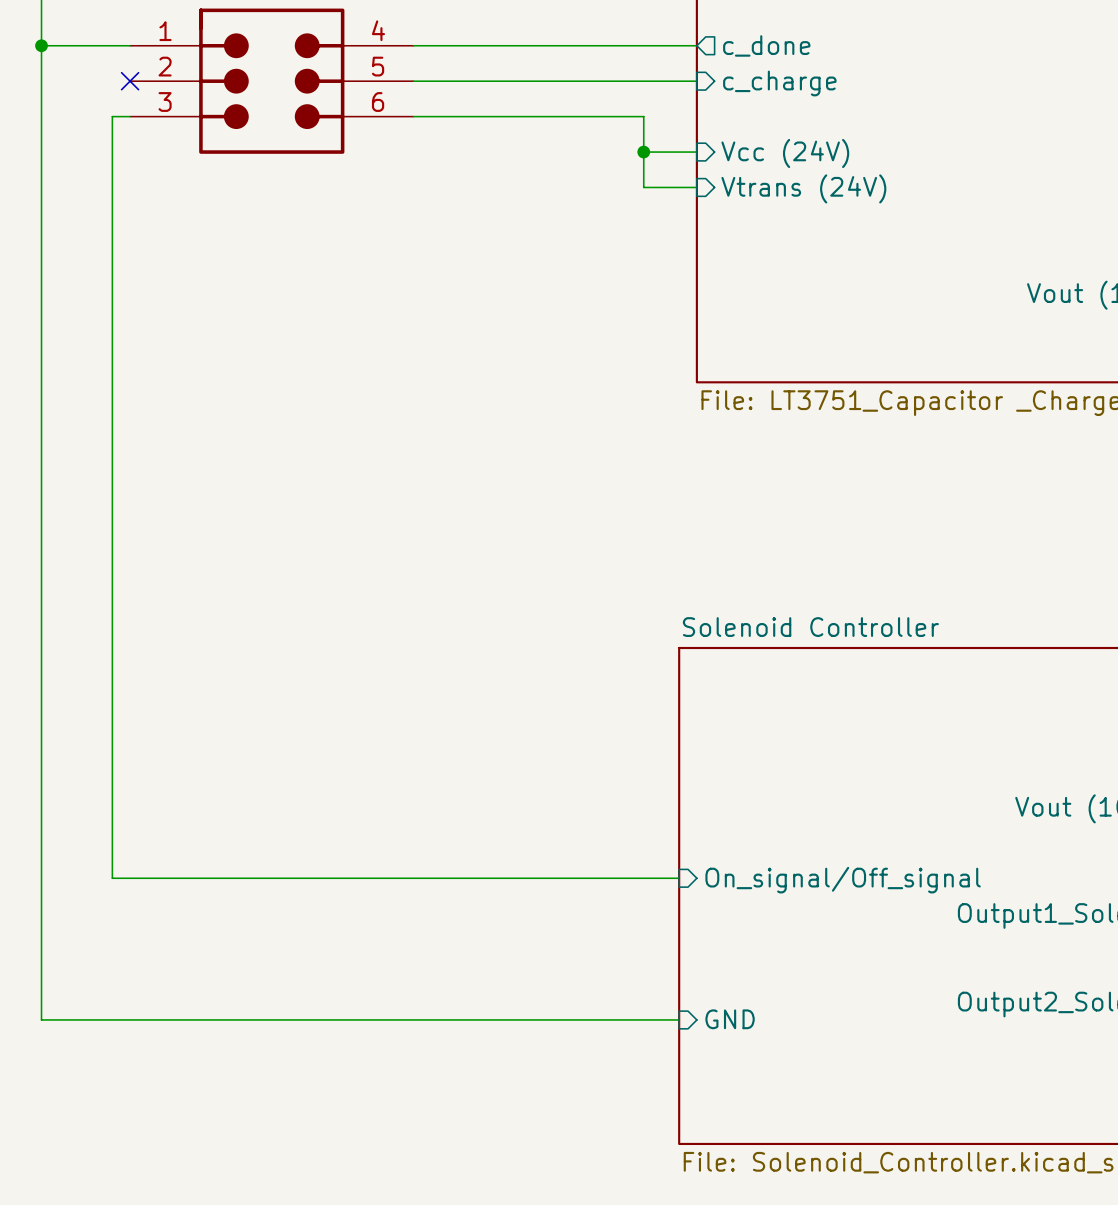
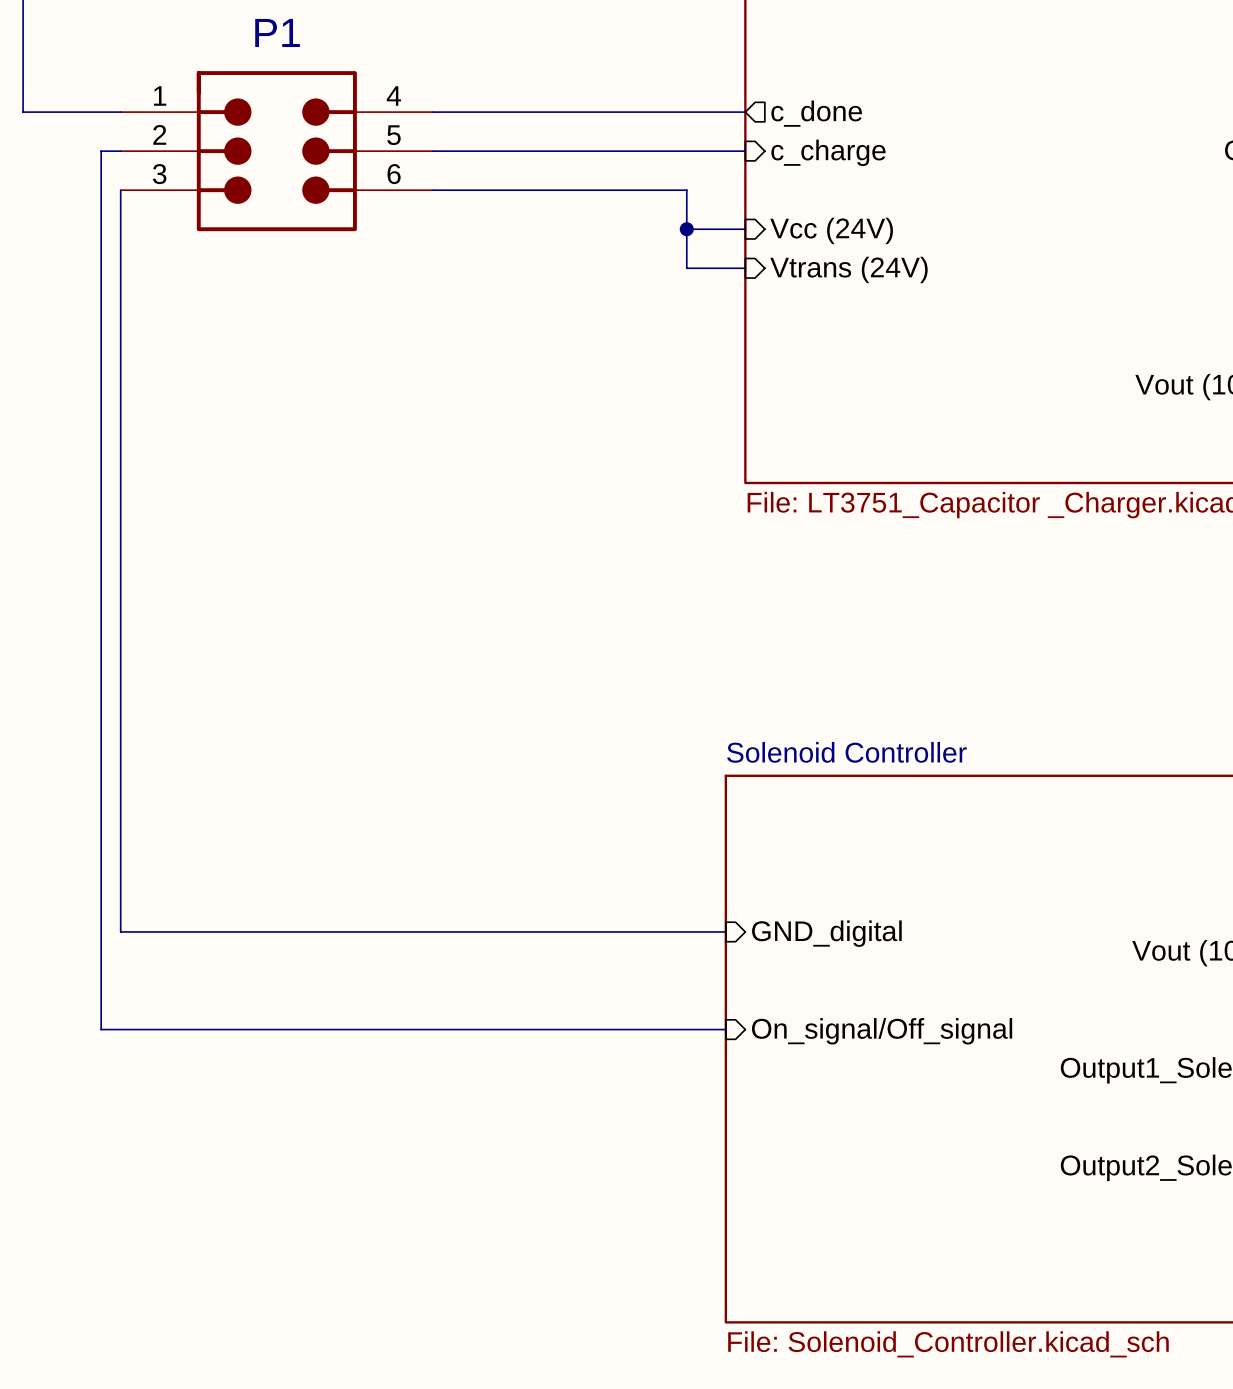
wire: (41, 45) (41, 1019) (679, 1019) -> none
junction: (41, 45) -> none
no-connect mark: (130, 81) -> none
wire: (112, 116) (130, 116) -> (101, 190) (101, 151) (120, 151)
wire: none -> (120, 190) (120, 931) (725, 931)
sheet pin: none -> GND_digital (826, 933)
sheet pin: GND (730, 1019) -> none

